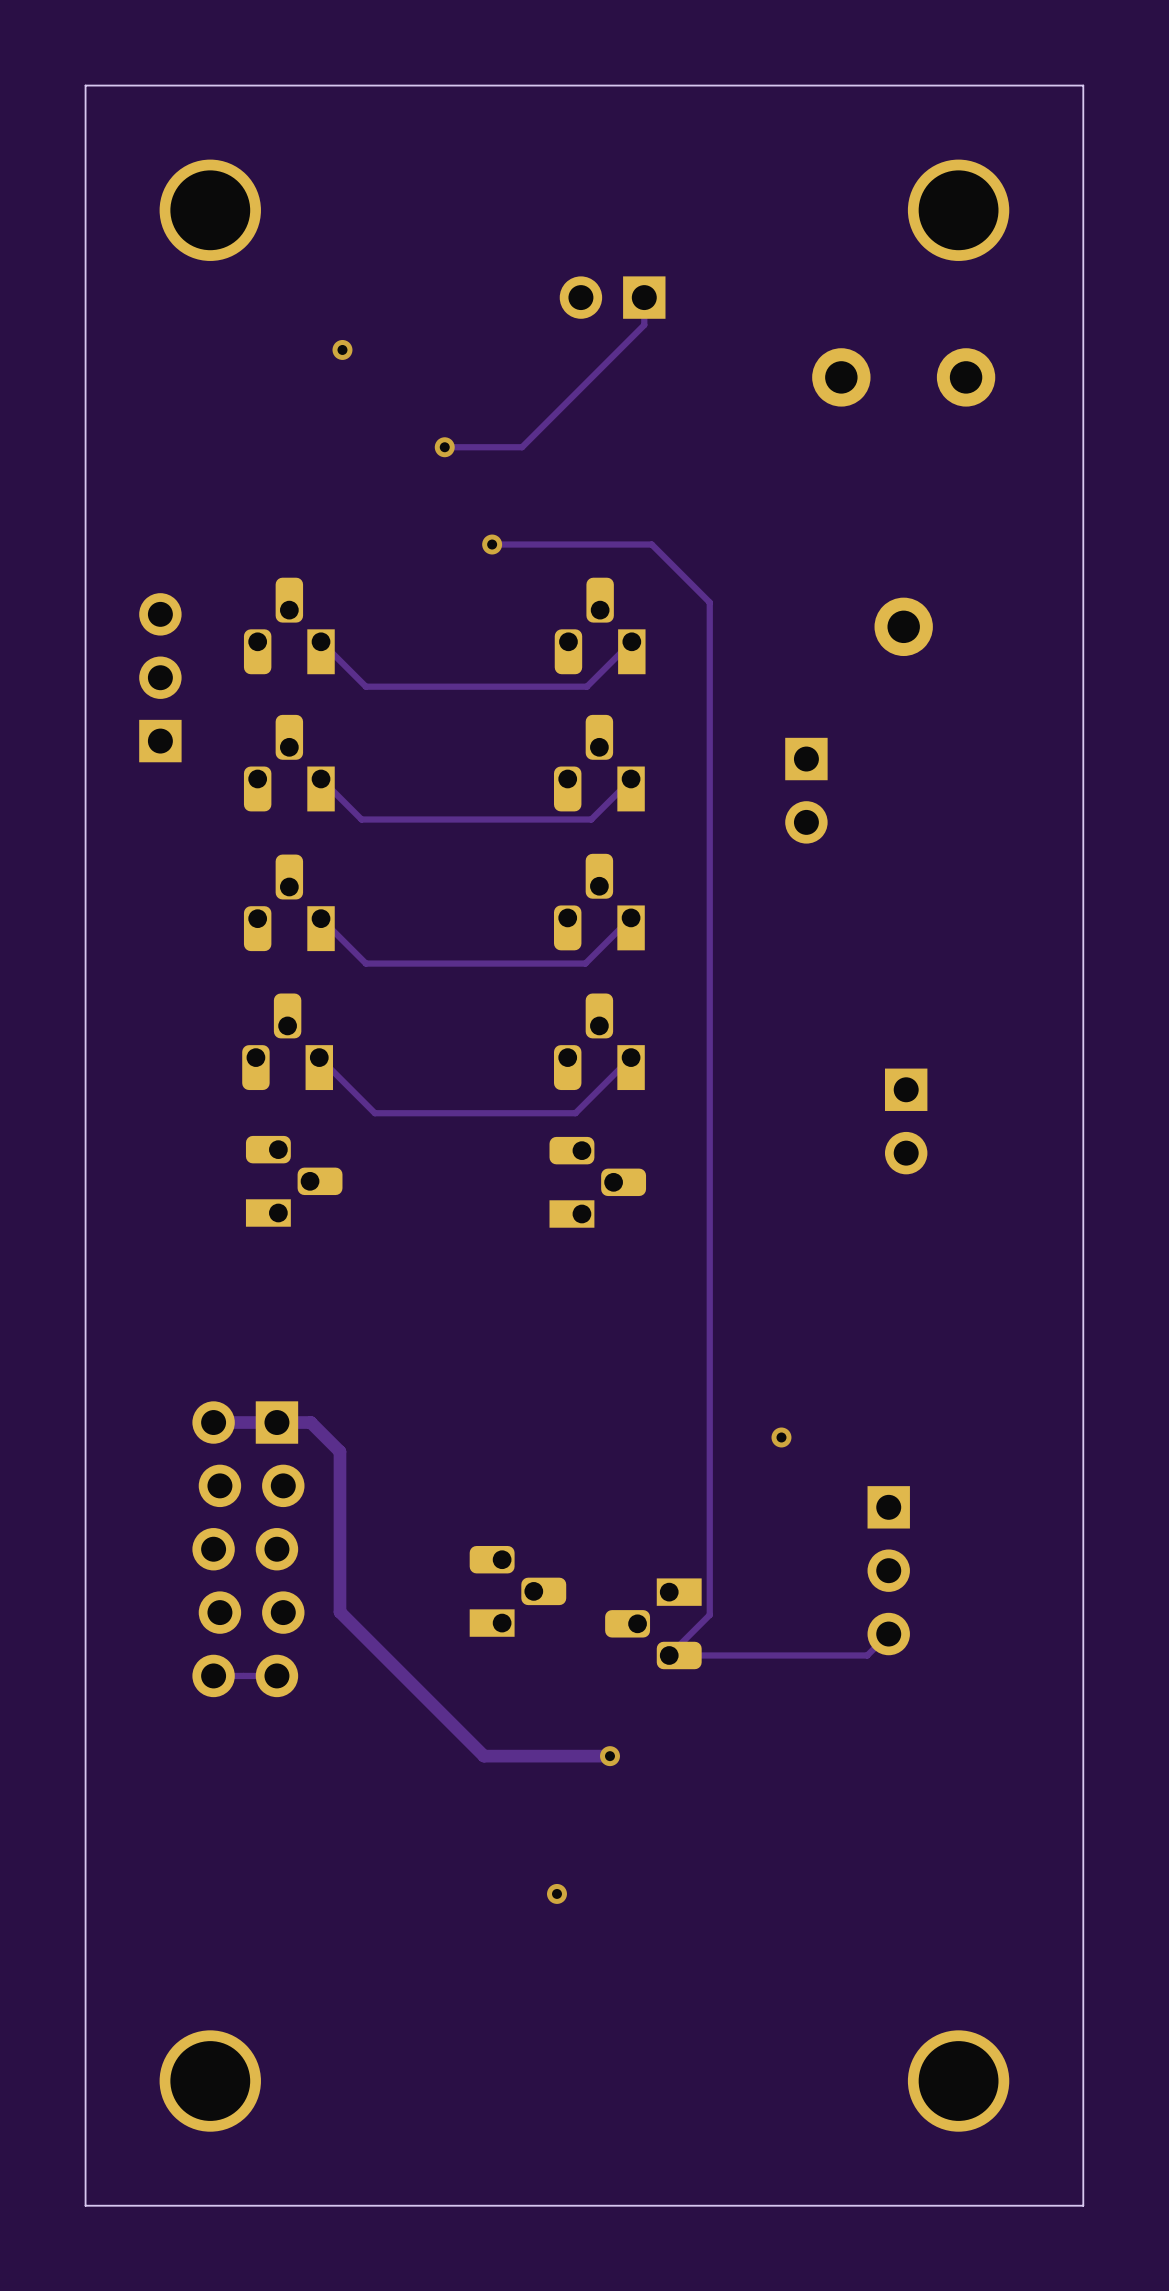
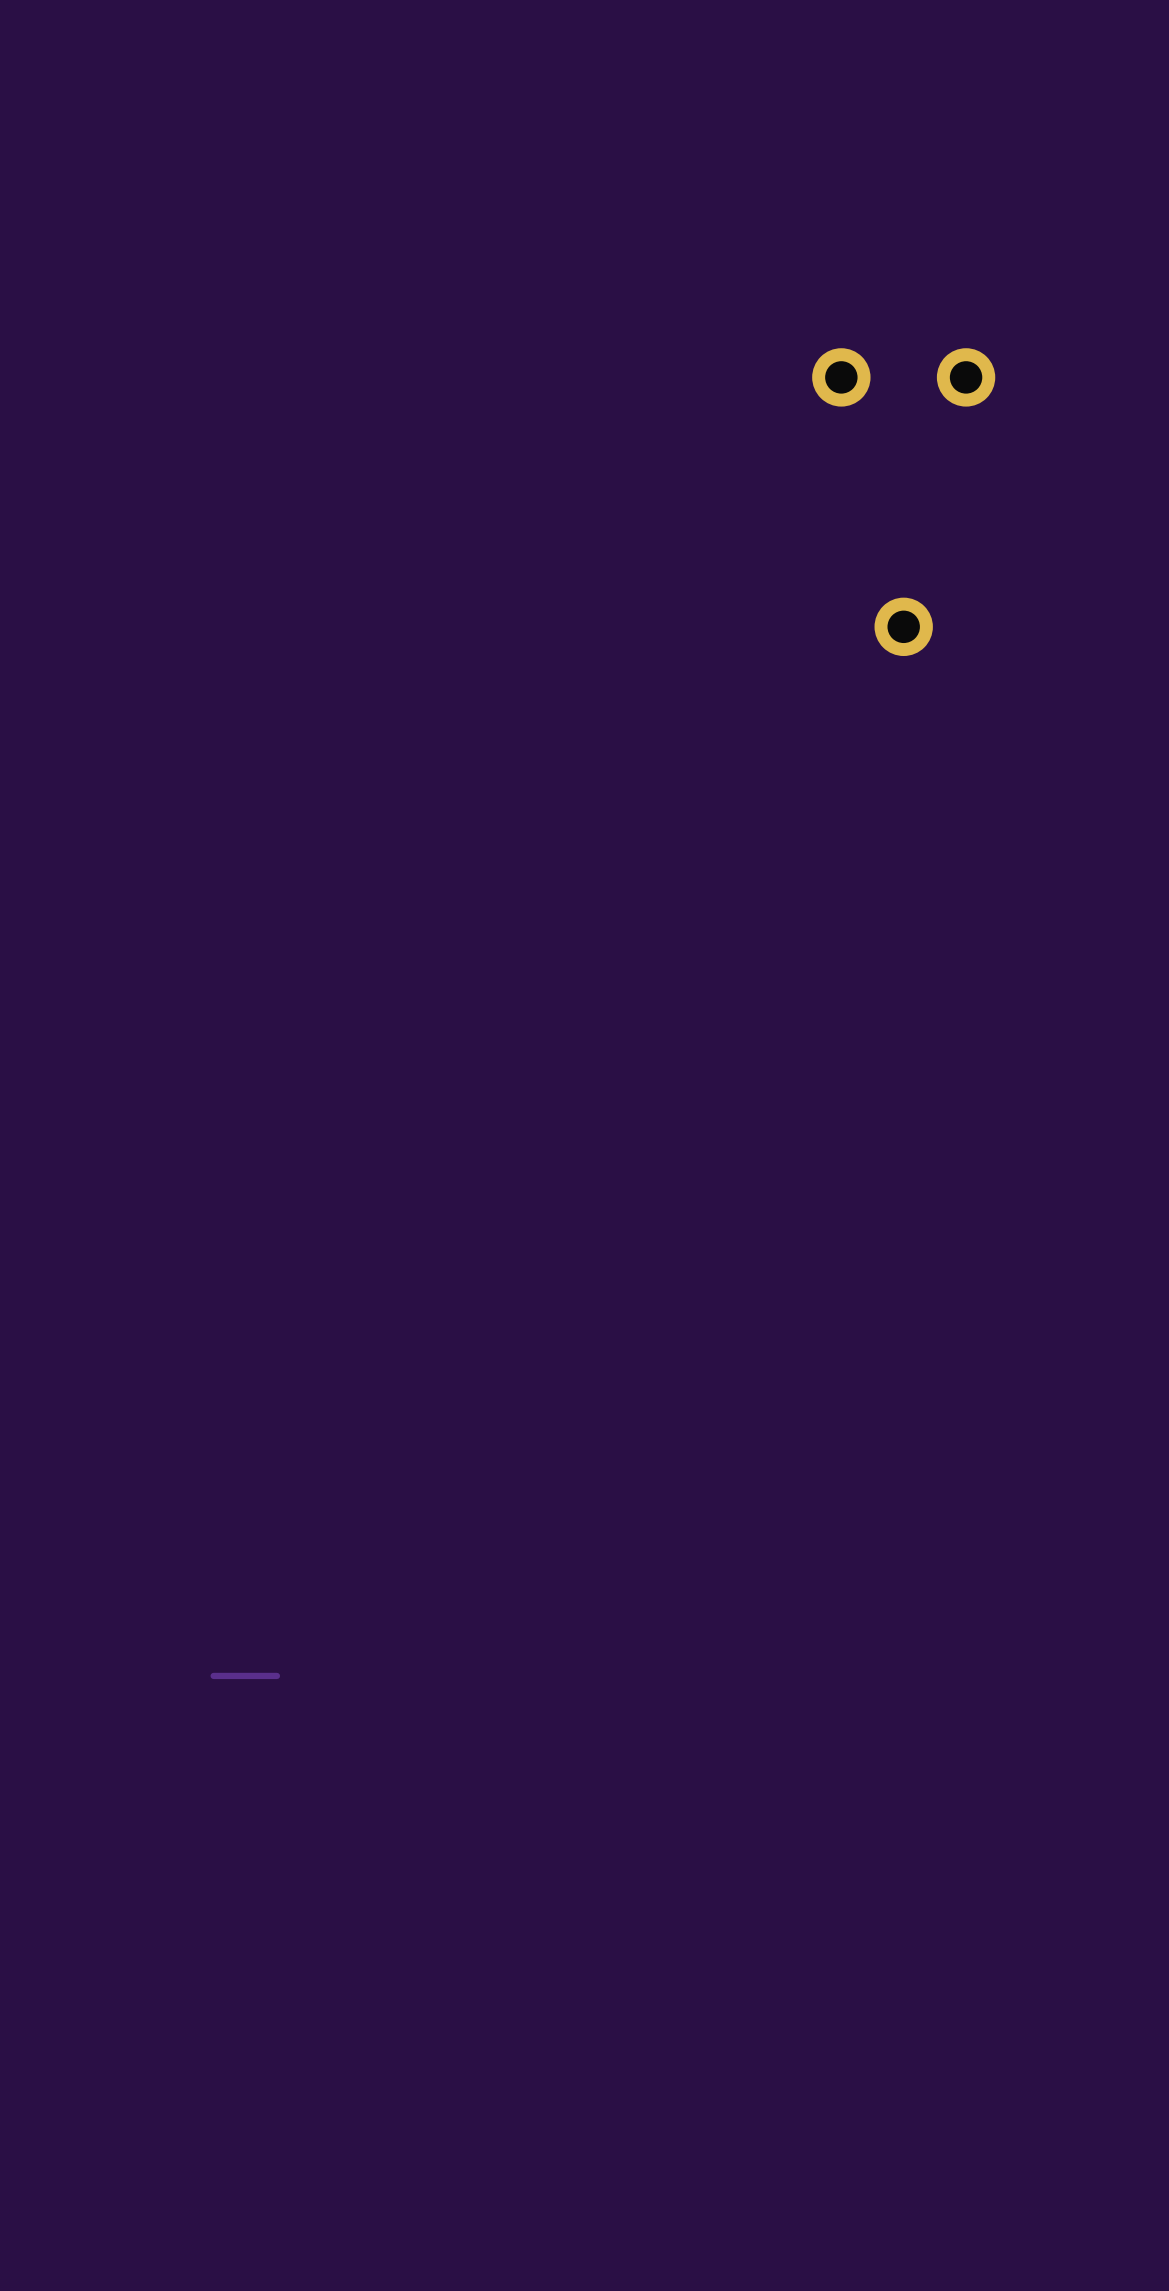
board edge: (1083, 85) (1083, 2205) (85, 2205) (85, 85) (1083, 85) -> none
part: (210, 210) -> none
part: (958, 210) -> none
part: (612, 297) -> none
track: (644, 297) (644, 325) (522, 447) (444, 447) -> none
via: (342, 349) -> none
via: (444, 447) -> none
track: (492, 544) (651, 544) (709, 602) (709, 1614) (669, 1655) (867, 1655) (888, 1634) -> none
via: (492, 544) -> none
part: (289, 625) -> none
part: (600, 625) -> none
track: (631, 641) (586, 686) (365, 686) (321, 641) -> none
part: (160, 677) -> none
part: (289, 763) -> none
part: (599, 763) -> none
track: (631, 778) (591, 819) (361, 819) (321, 778) -> none
part: (806, 790) -> none
part: (289, 902) -> none
part: (599, 902) -> none
track: (631, 917) (585, 963) (365, 963) (321, 918) -> none
part: (287, 1041) -> none
part: (599, 1041) -> none
track: (631, 1057) (575, 1113) (374, 1113) (319, 1057) -> none
part: (906, 1121) -> none
part: (294, 1181) -> none
part: (597, 1182) -> none
track: (213, 1422) (310, 1422) (339, 1451) (339, 1612) (484, 1756) (609, 1756) -> none
via: (781, 1437) -> none
part: (248, 1549) -> none
part: (888, 1570) -> none
part: (517, 1591) -> none
part: (653, 1623) -> none
via: (609, 1756) -> none
via: (556, 1893) -> none
part: (210, 2081) -> none
part: (958, 2081) -> none

